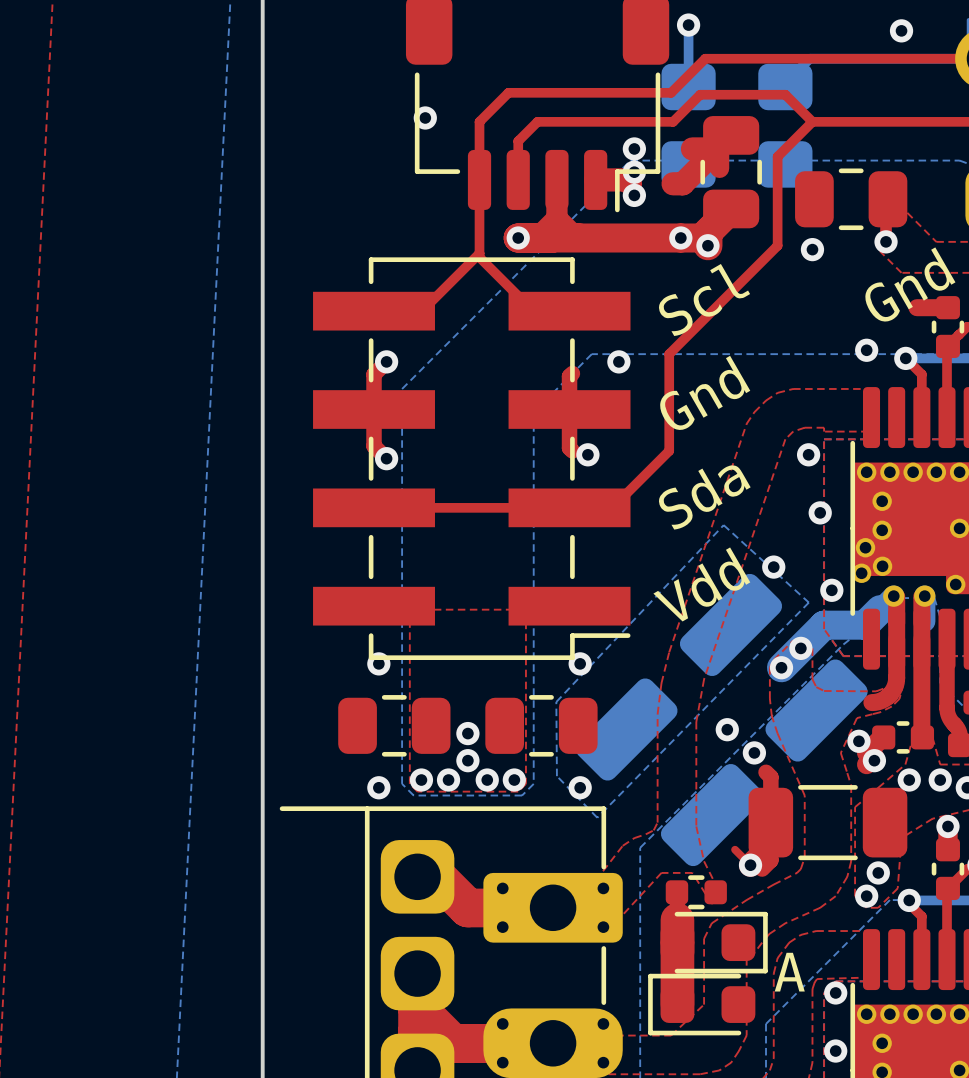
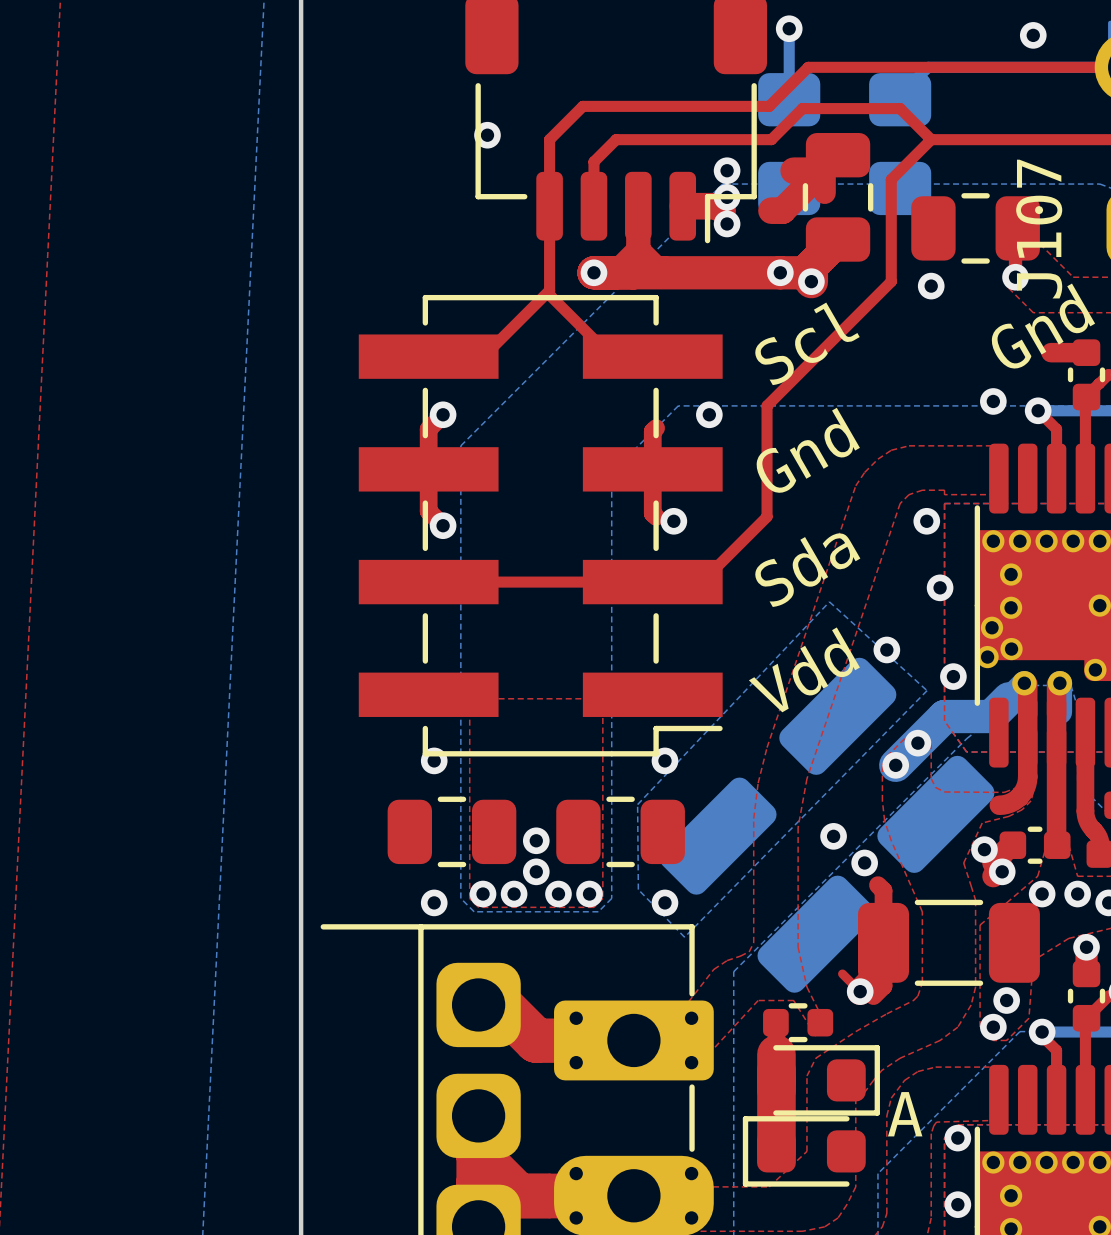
J107 name: none -> J107 (1039, 229)

